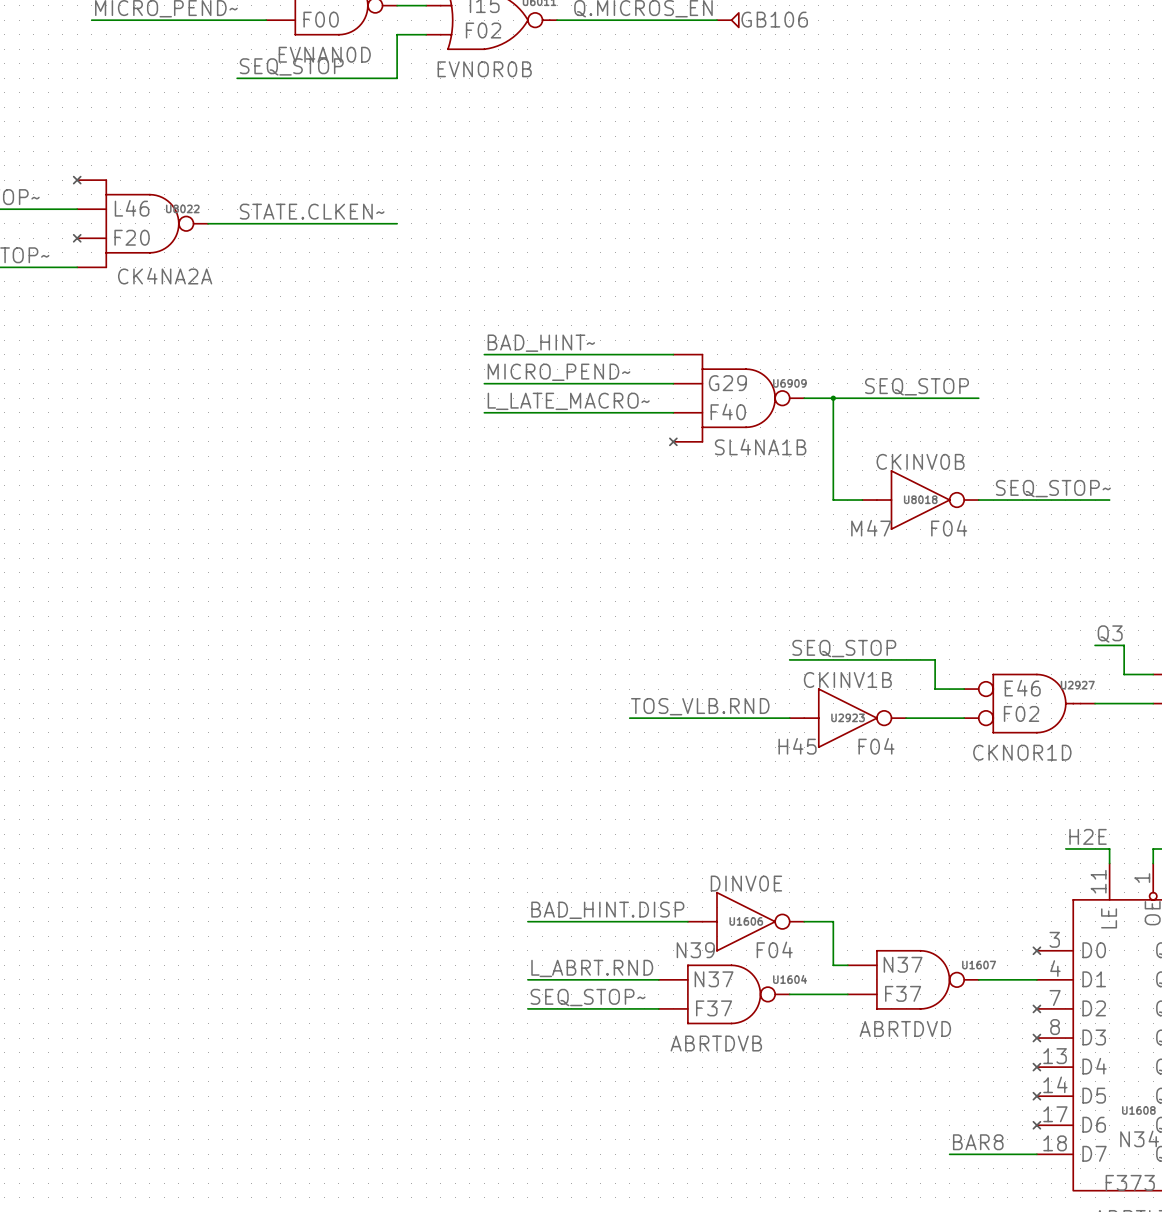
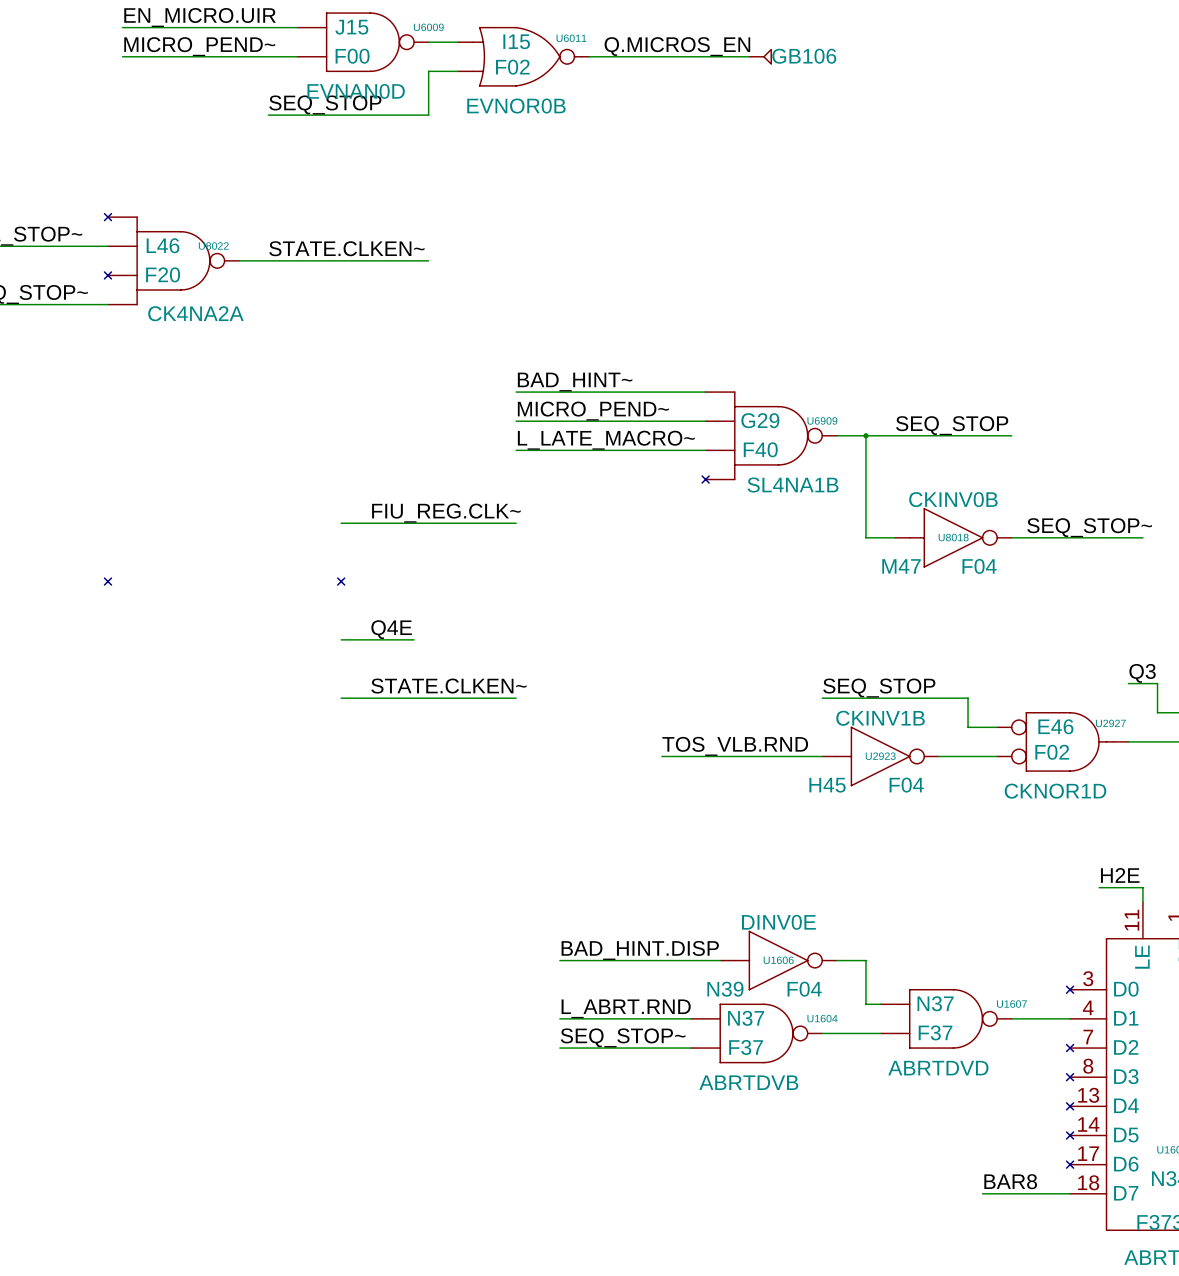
label: none -> FIU_REG.CLK~ (446, 513)
wire: none -> (341, 523) (516, 523)
no-connect mark: none -> (107, 581)
no-connect mark: none -> (341, 581)
label: none -> Q4E (391, 629)
wire: none -> (341, 639) (414, 639)
label: none -> STATE.CLKEN~ (448, 686)
wire: none -> (341, 698) (516, 698)

